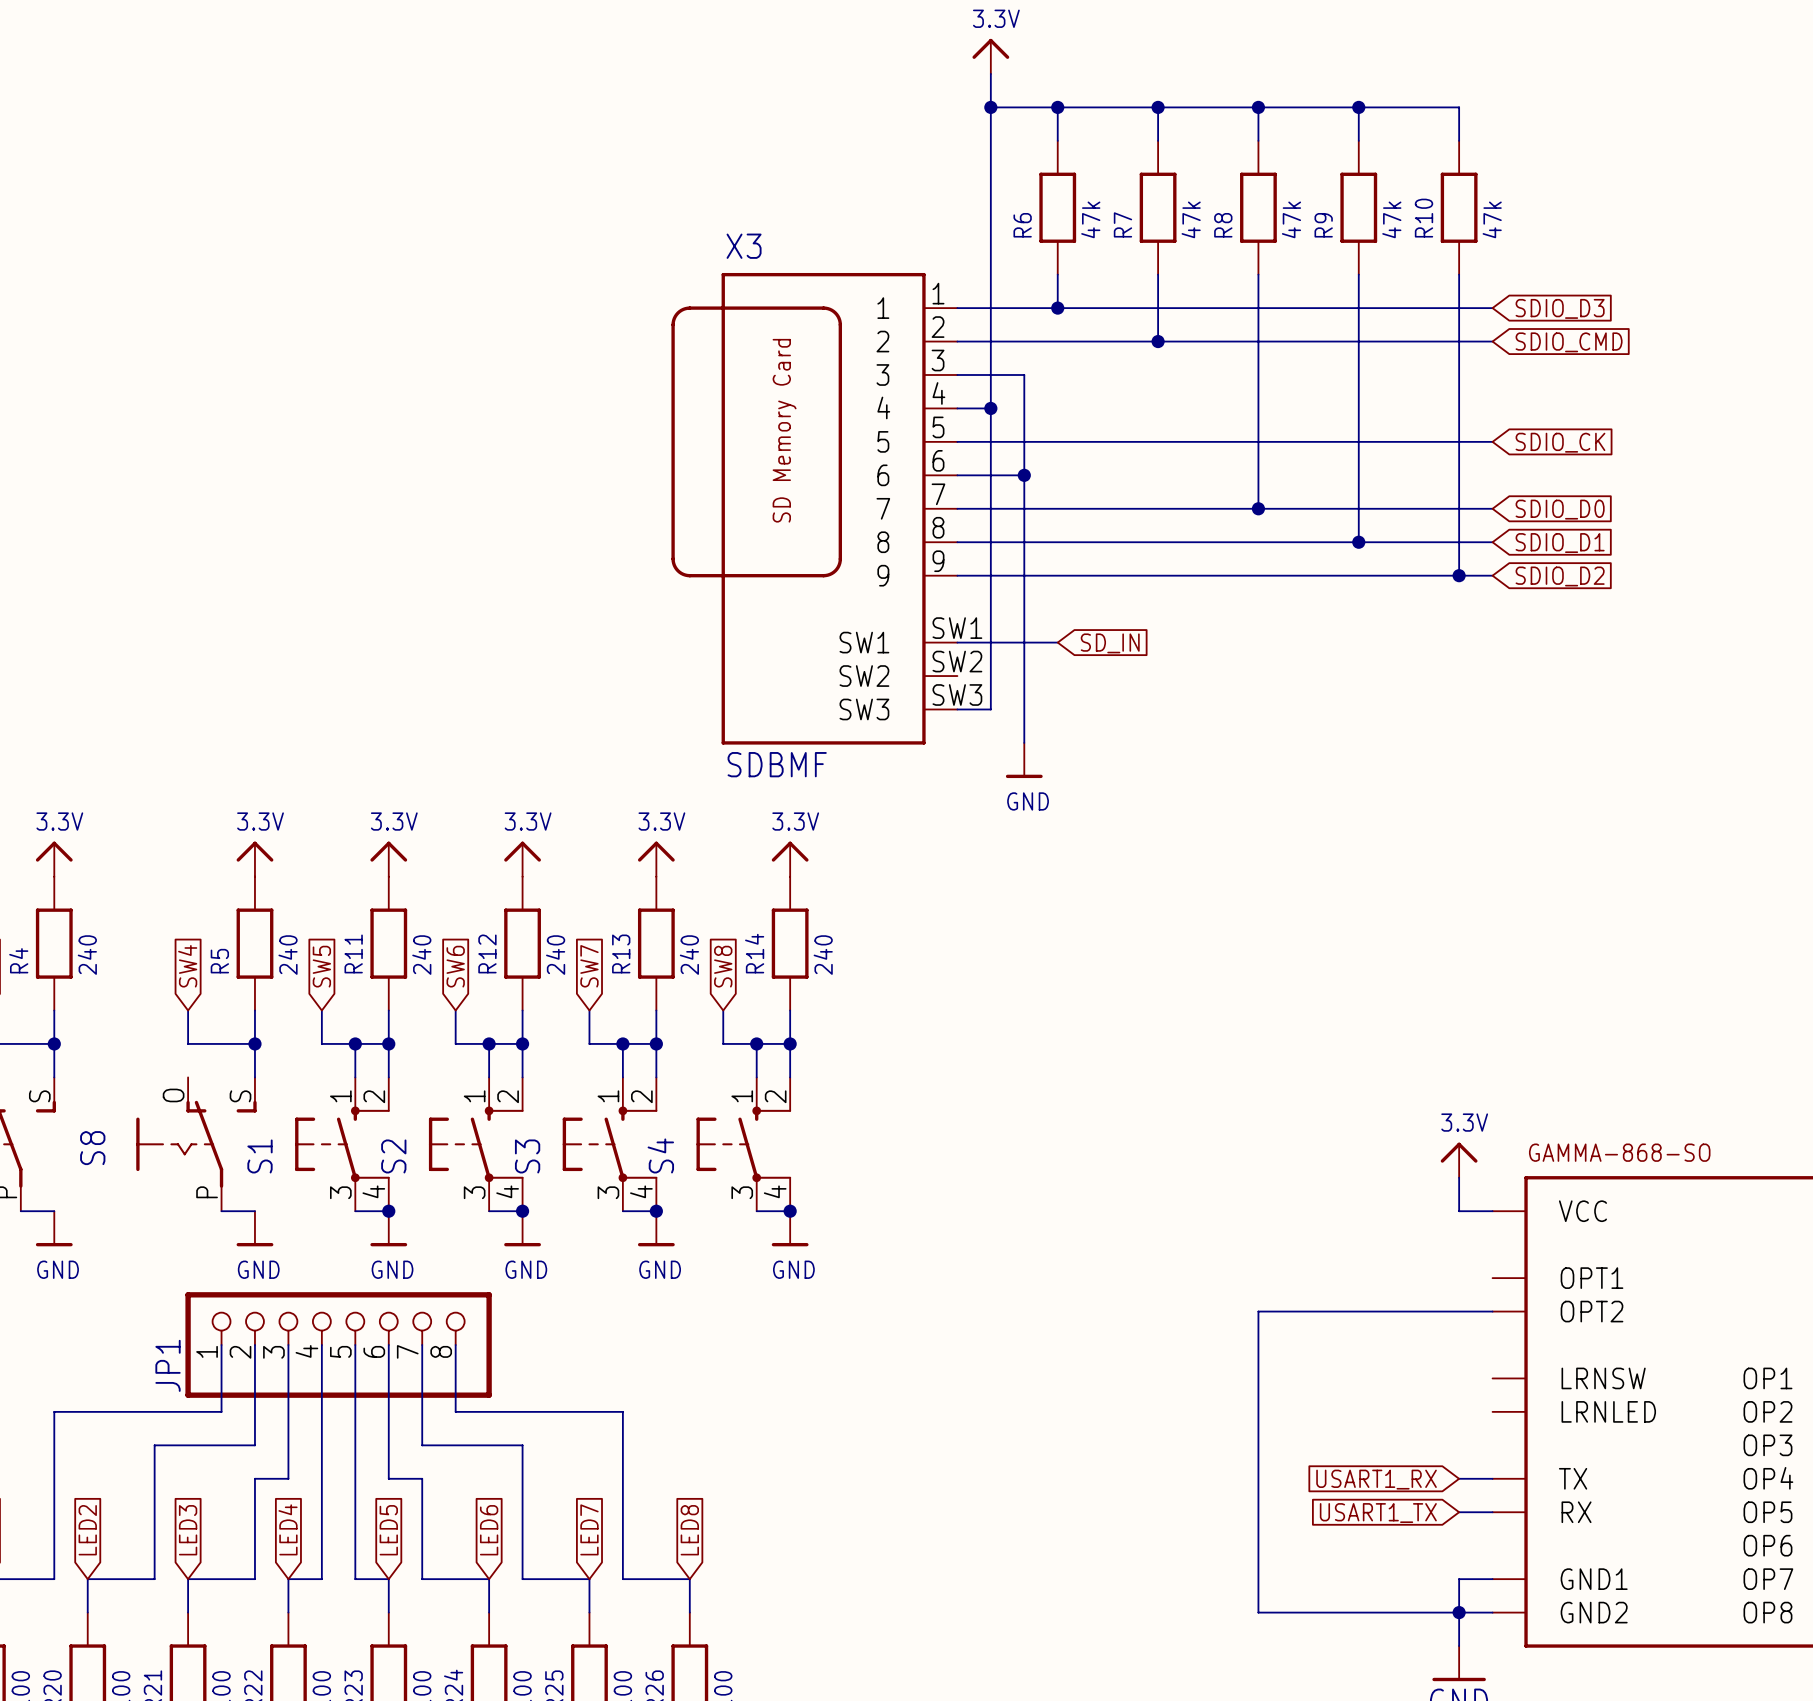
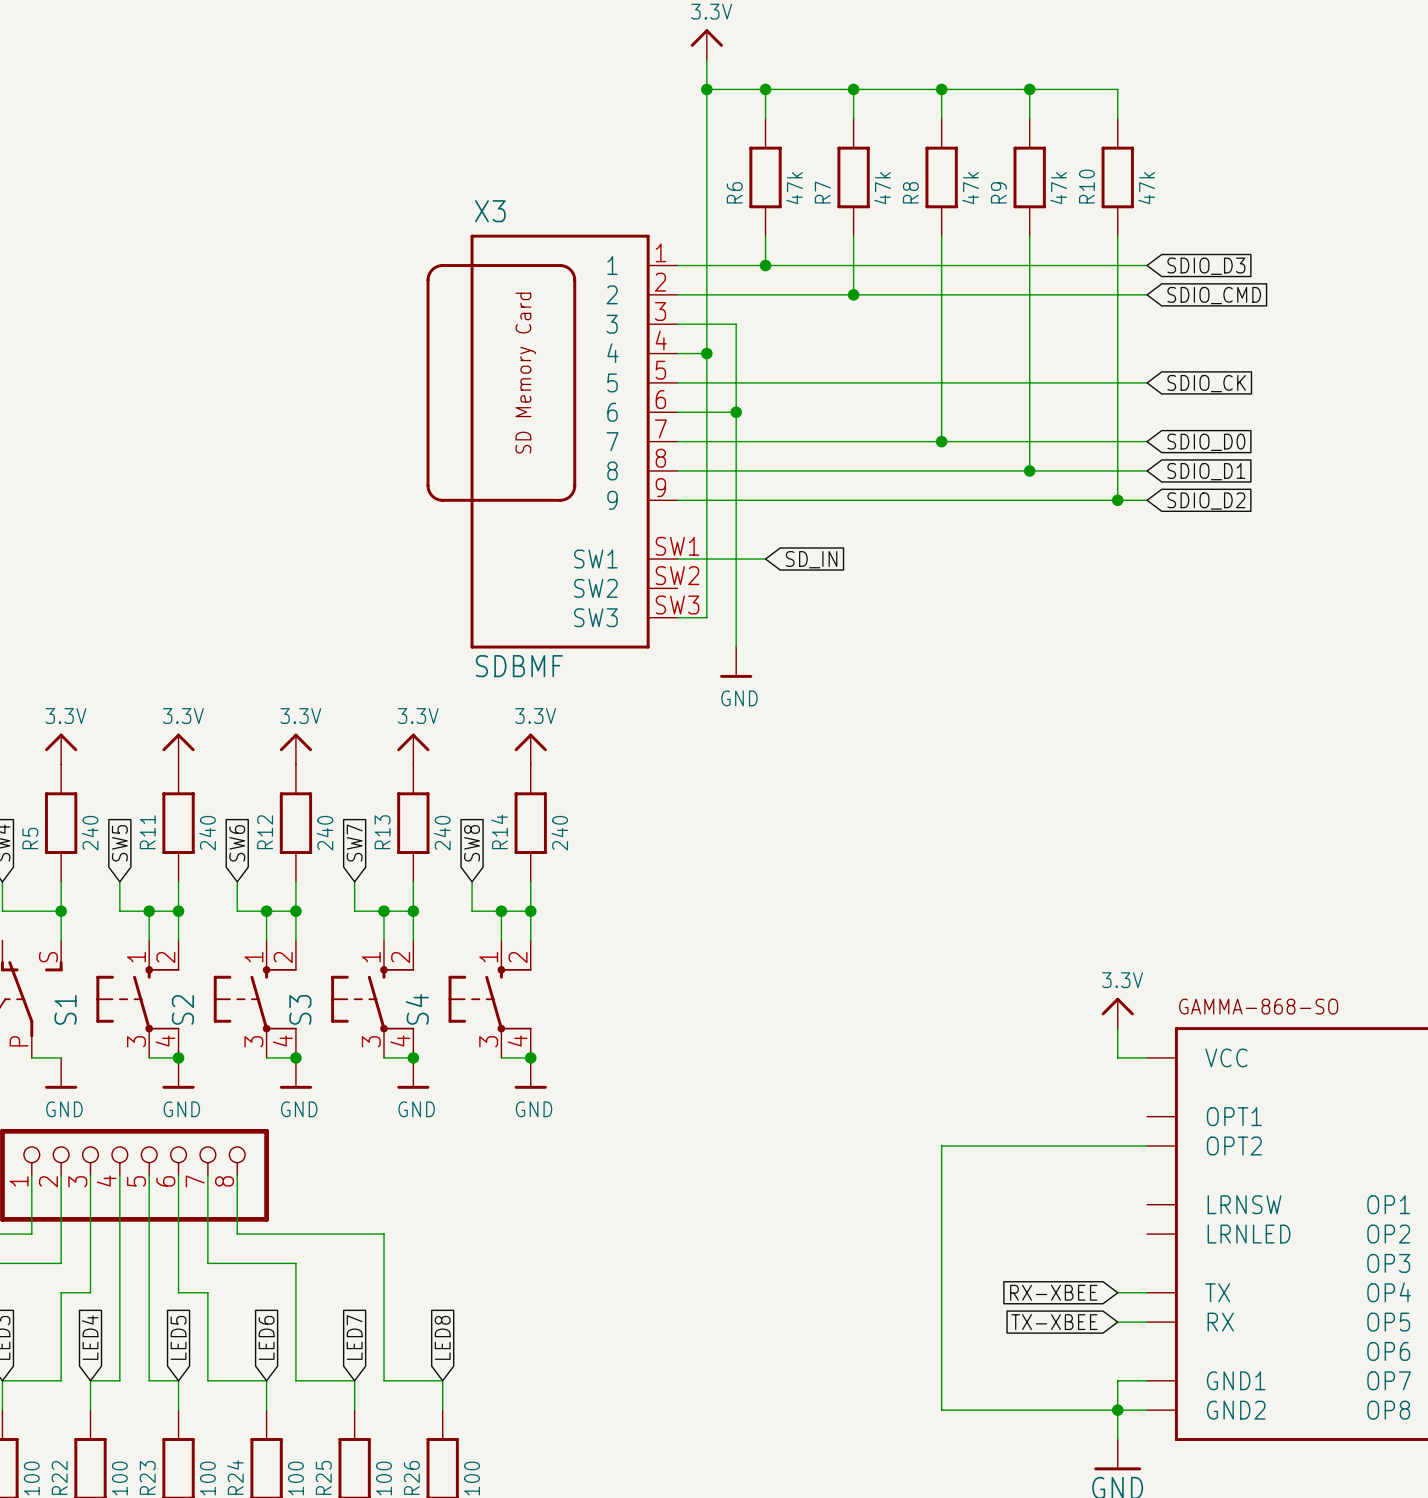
global label: USART1_RX (1376, 1479) -> RX-XBEE (1053, 1292)
global label: USART1_TX (1378, 1513) -> TX-XBEE (1054, 1322)

